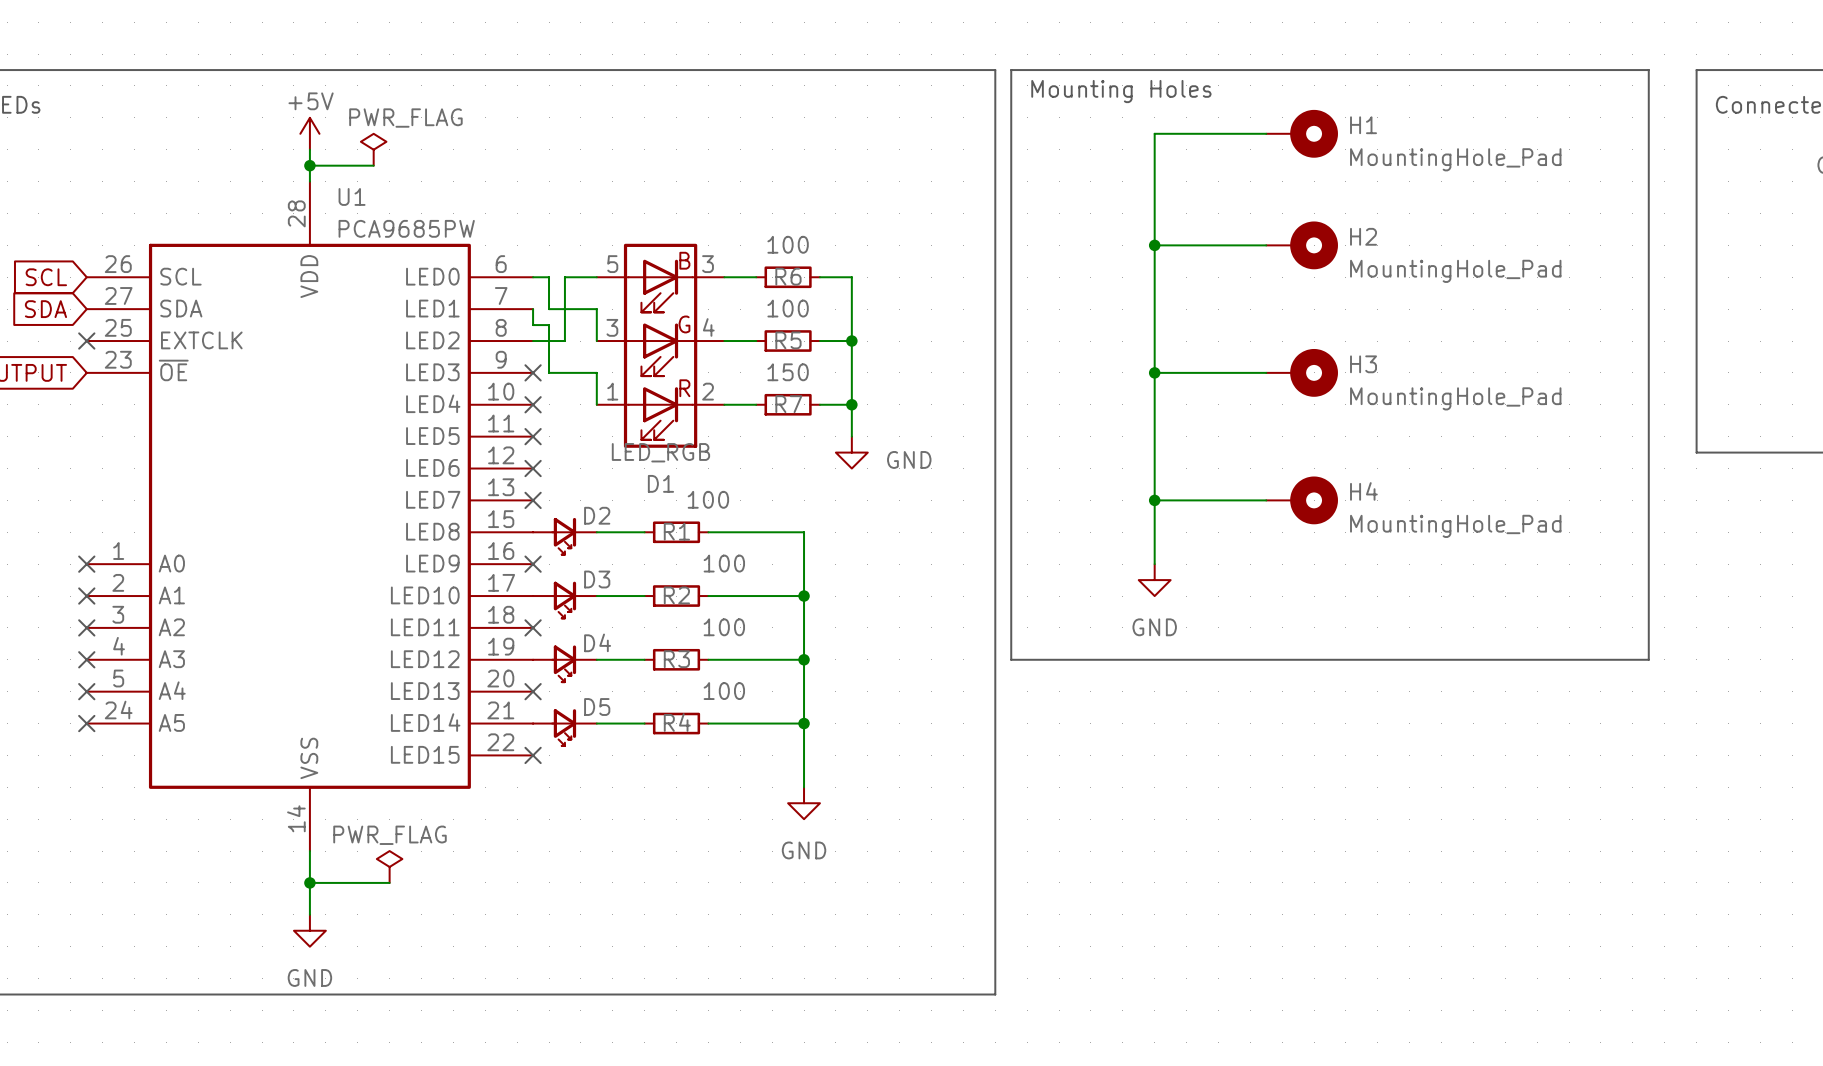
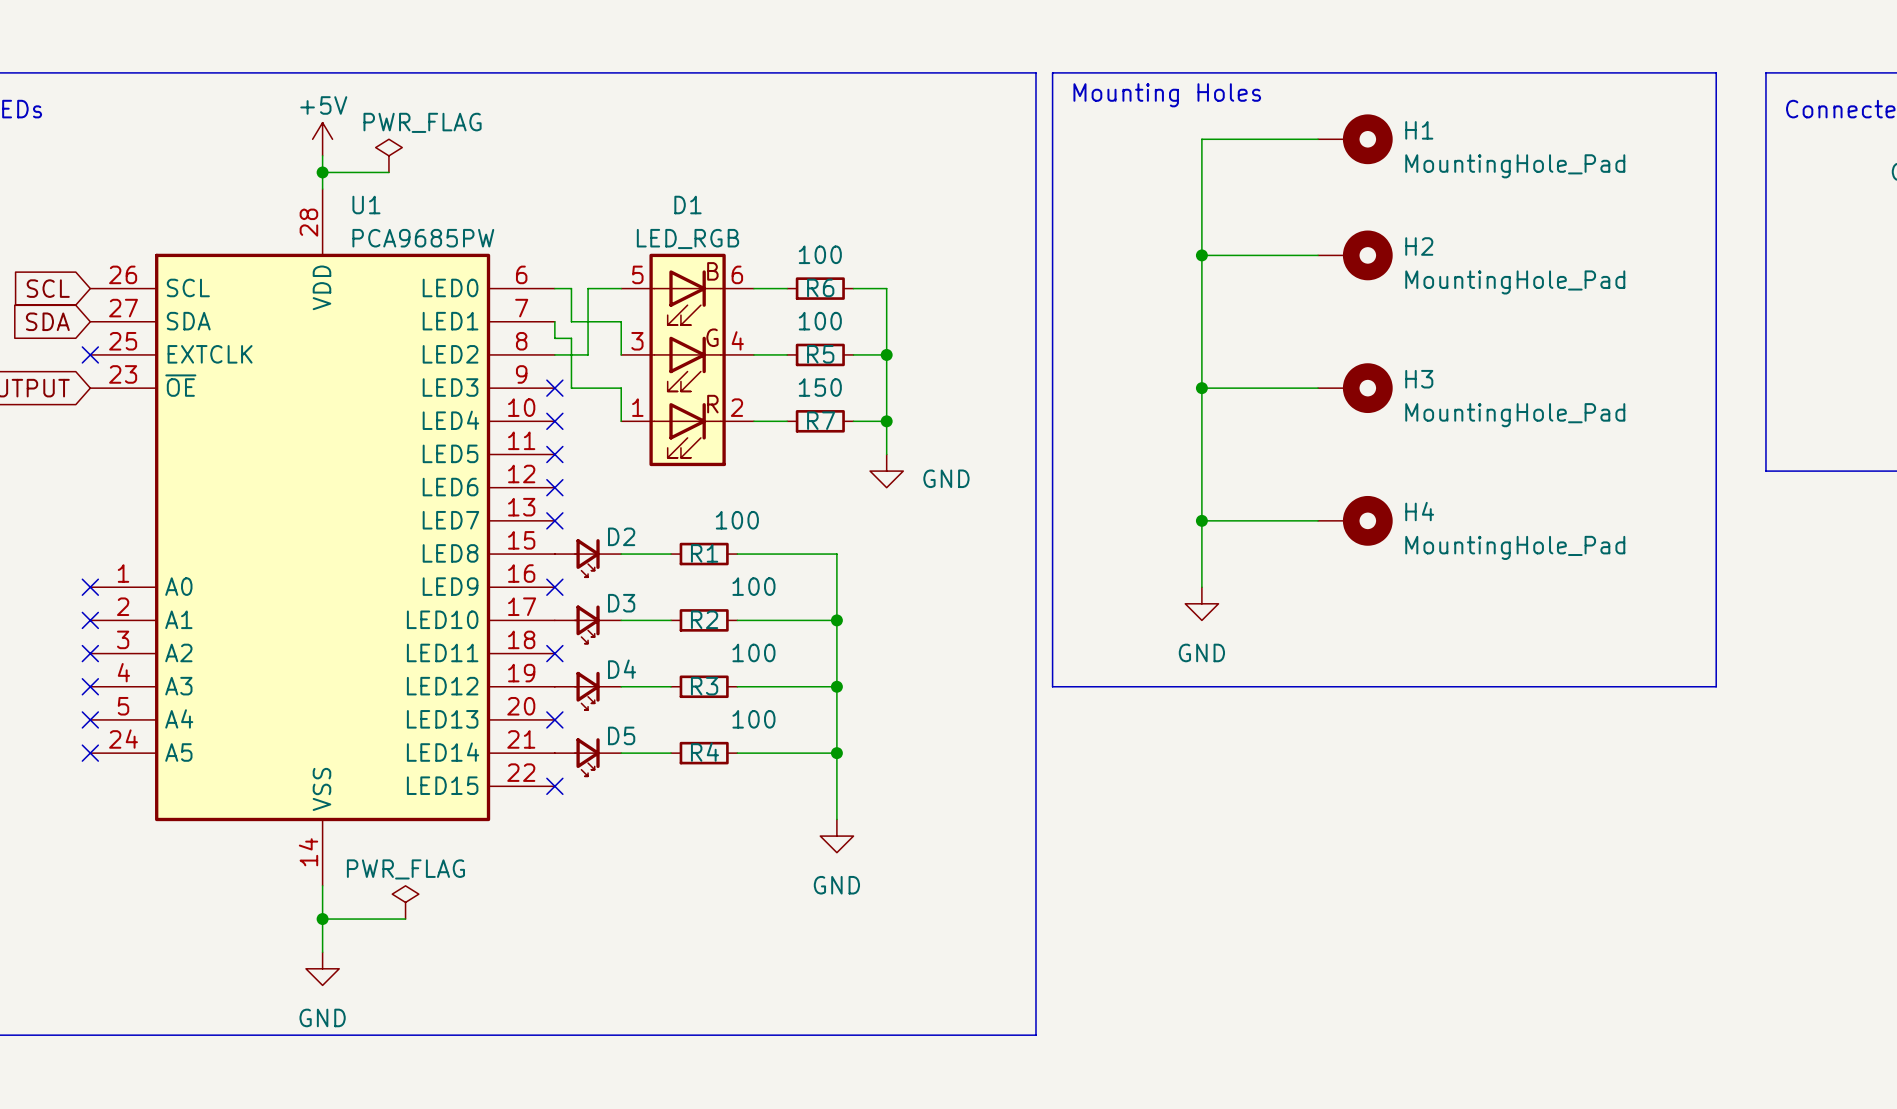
D1 pin number: 3 (708, 264) -> 6 (737, 274)
D1 value position: LED_RGB (660, 452) -> LED_RGB (687, 238)
D1 name position: D1 (660, 483) -> D1 (687, 205)

